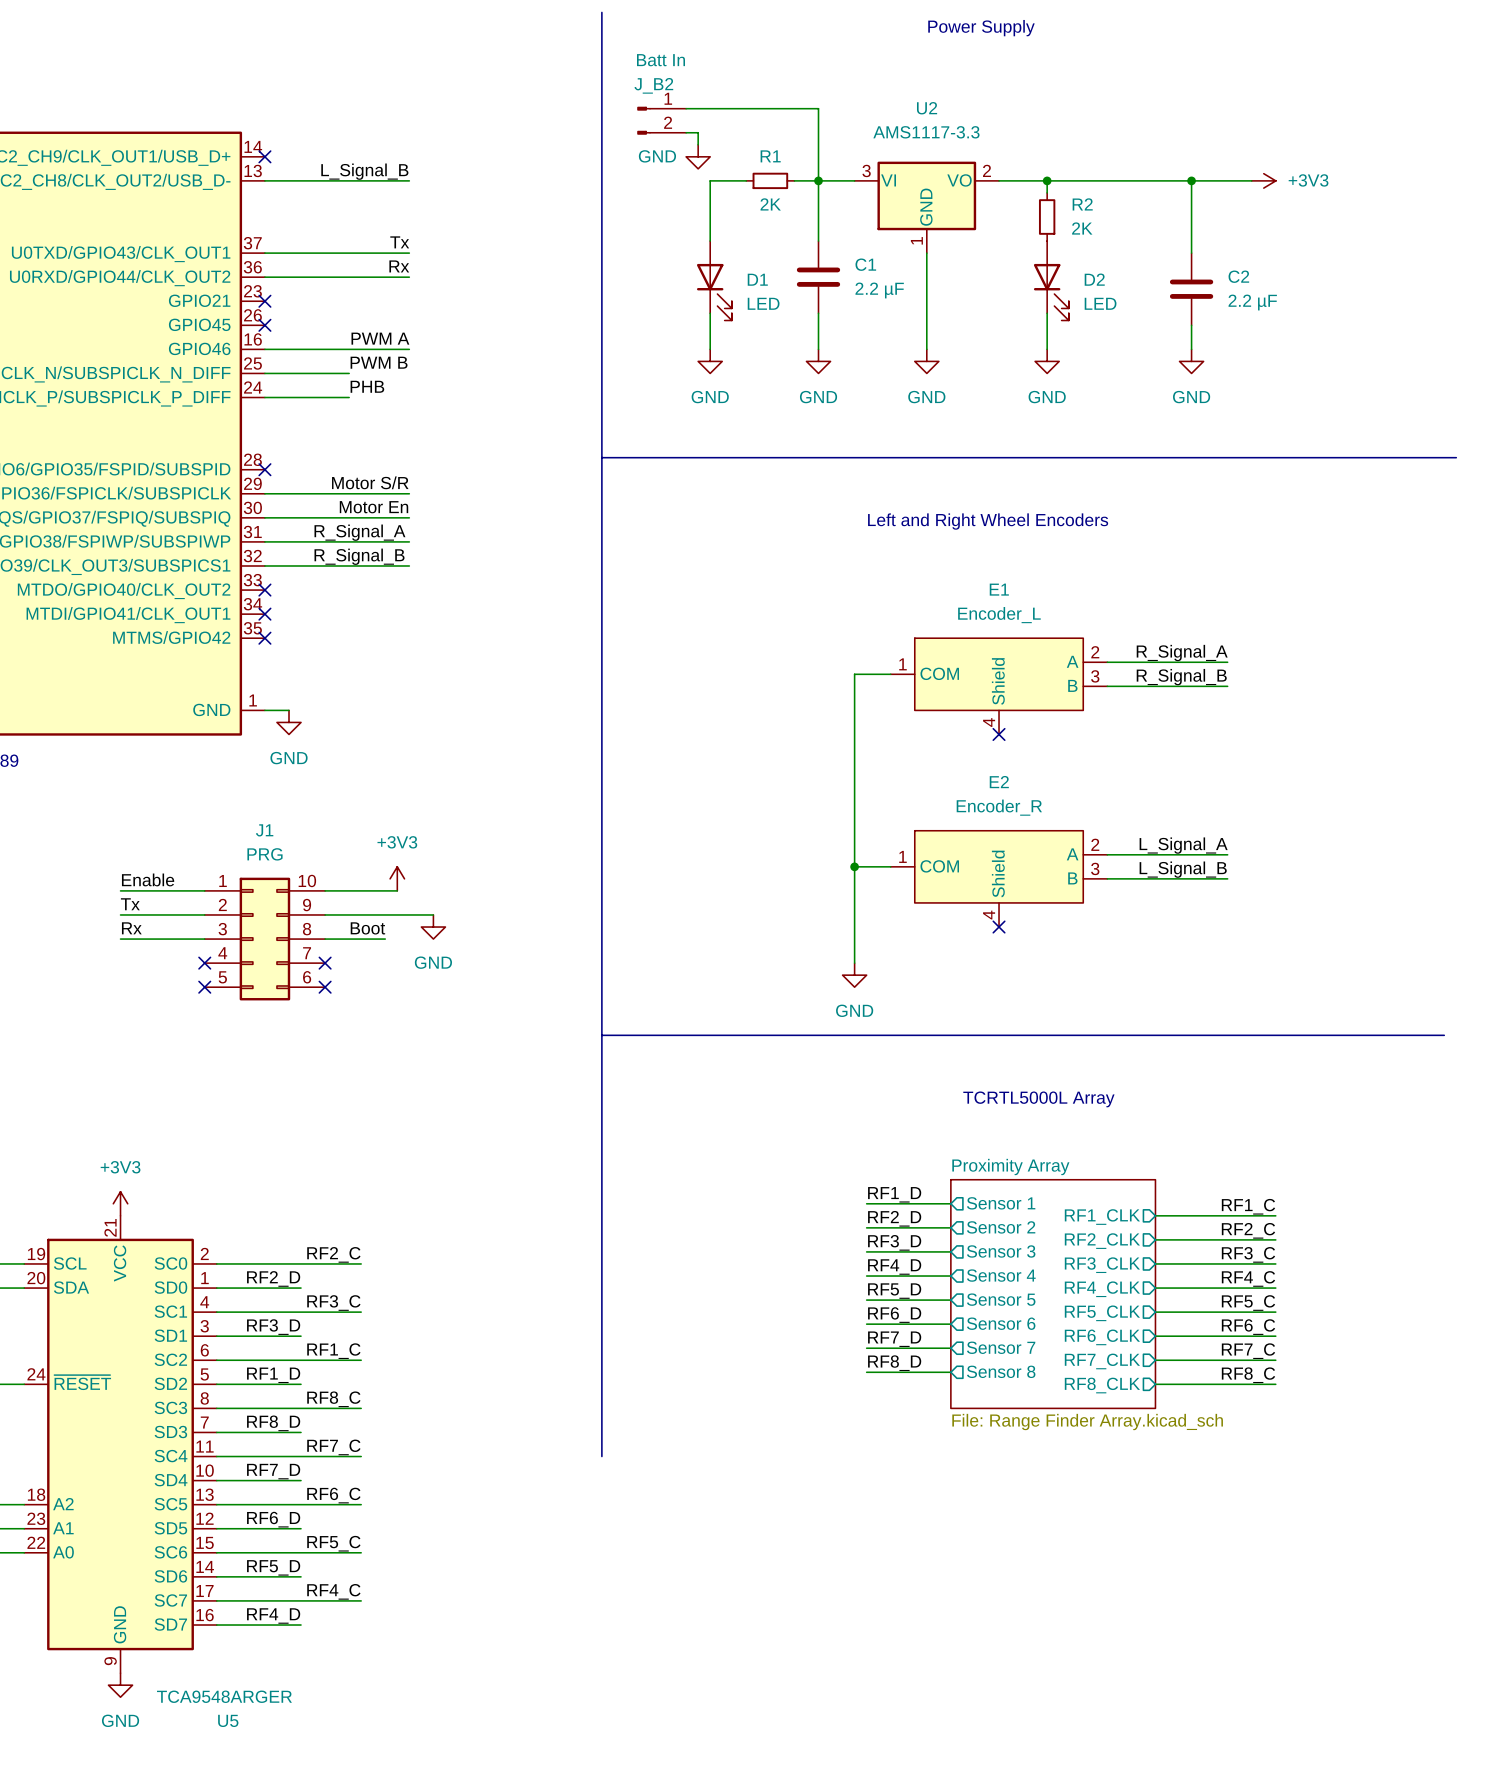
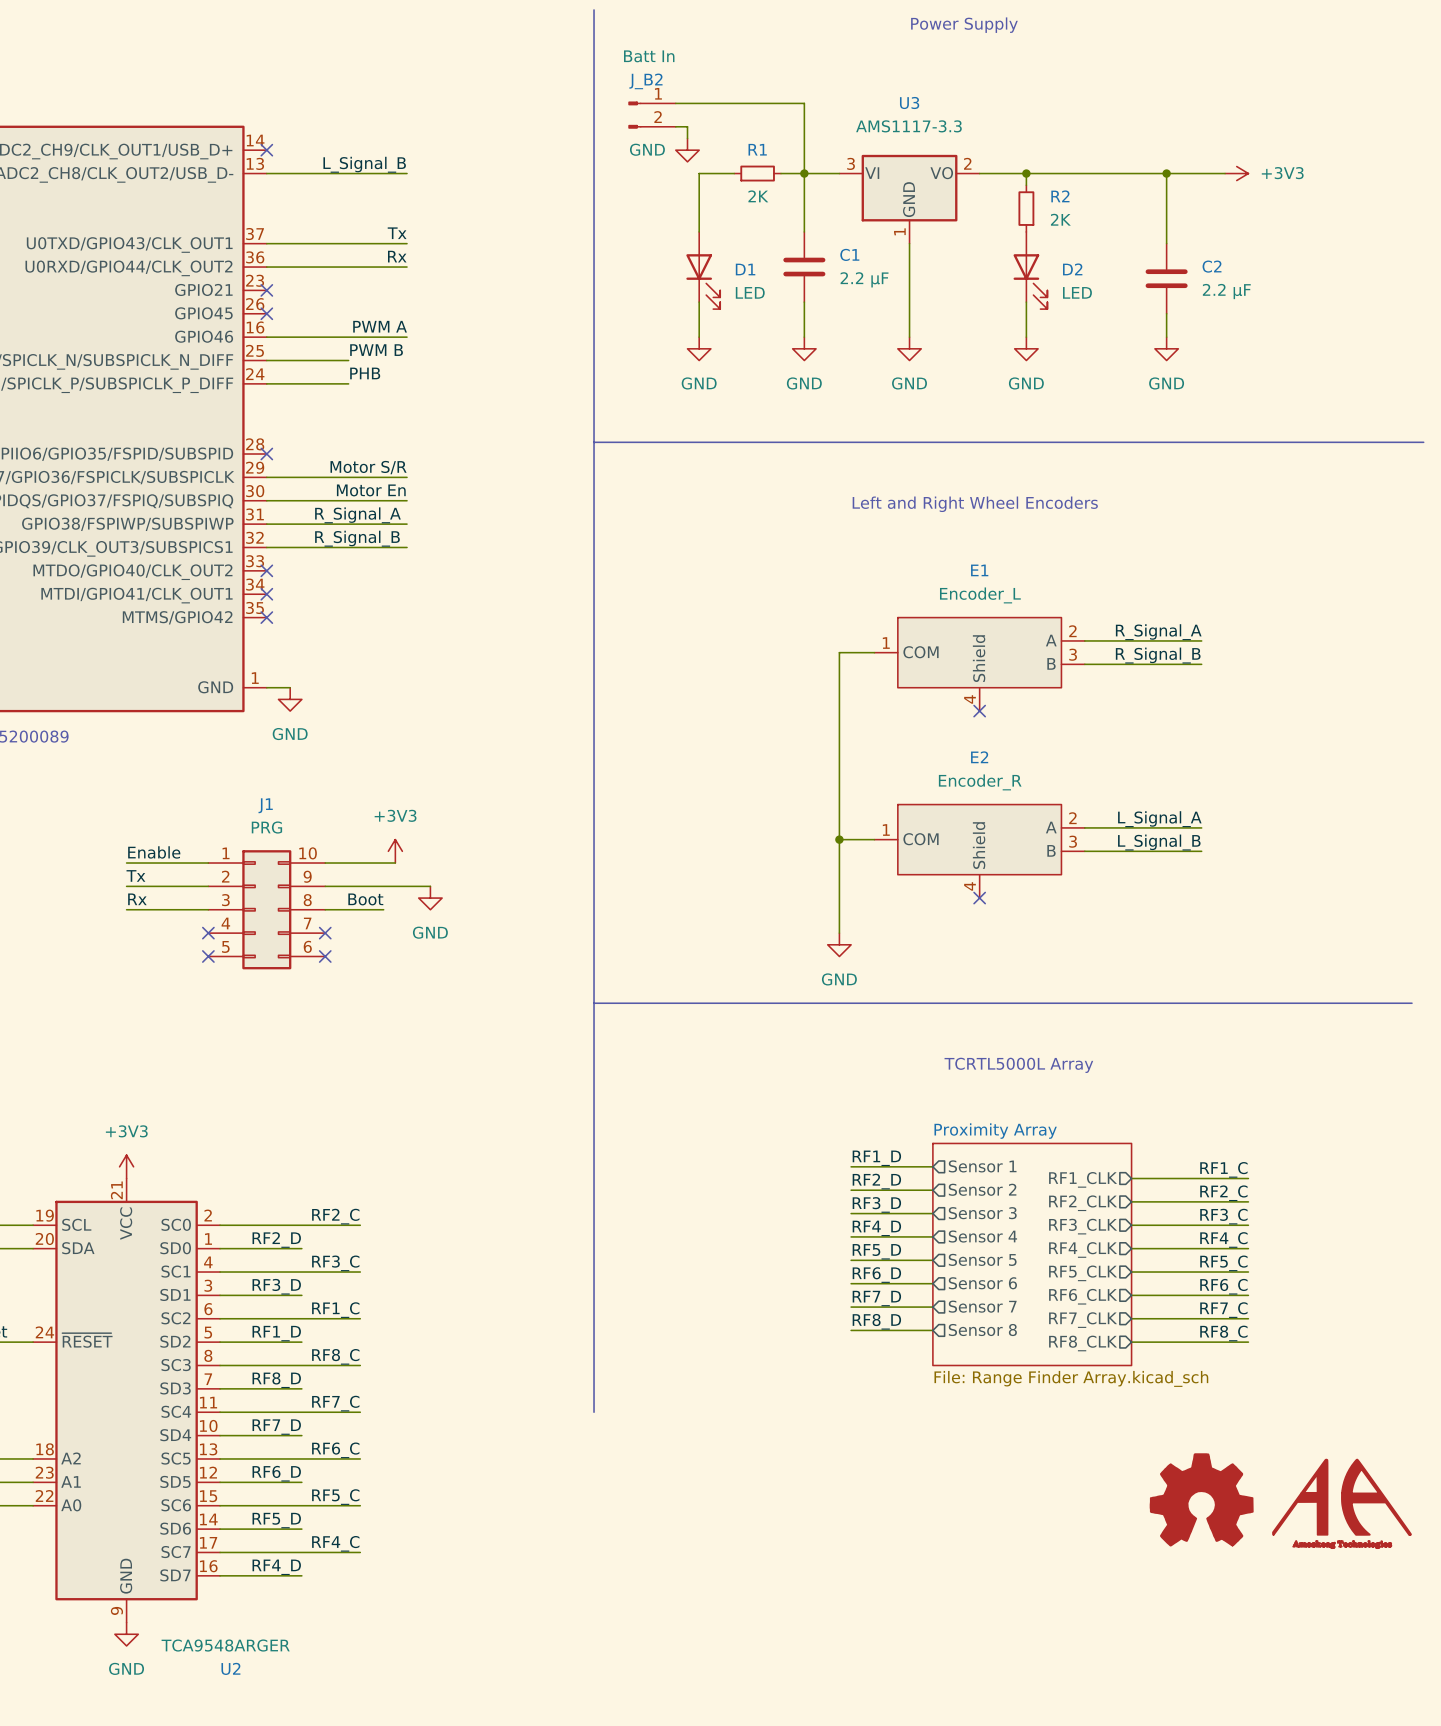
U2 name: U2 (927, 108) -> U3 (909, 103)
power symbol: none -> (1201, 1499)
power symbol: none -> (1342, 1503)
U5 name: U5 (228, 1720) -> U2 (230, 1668)

